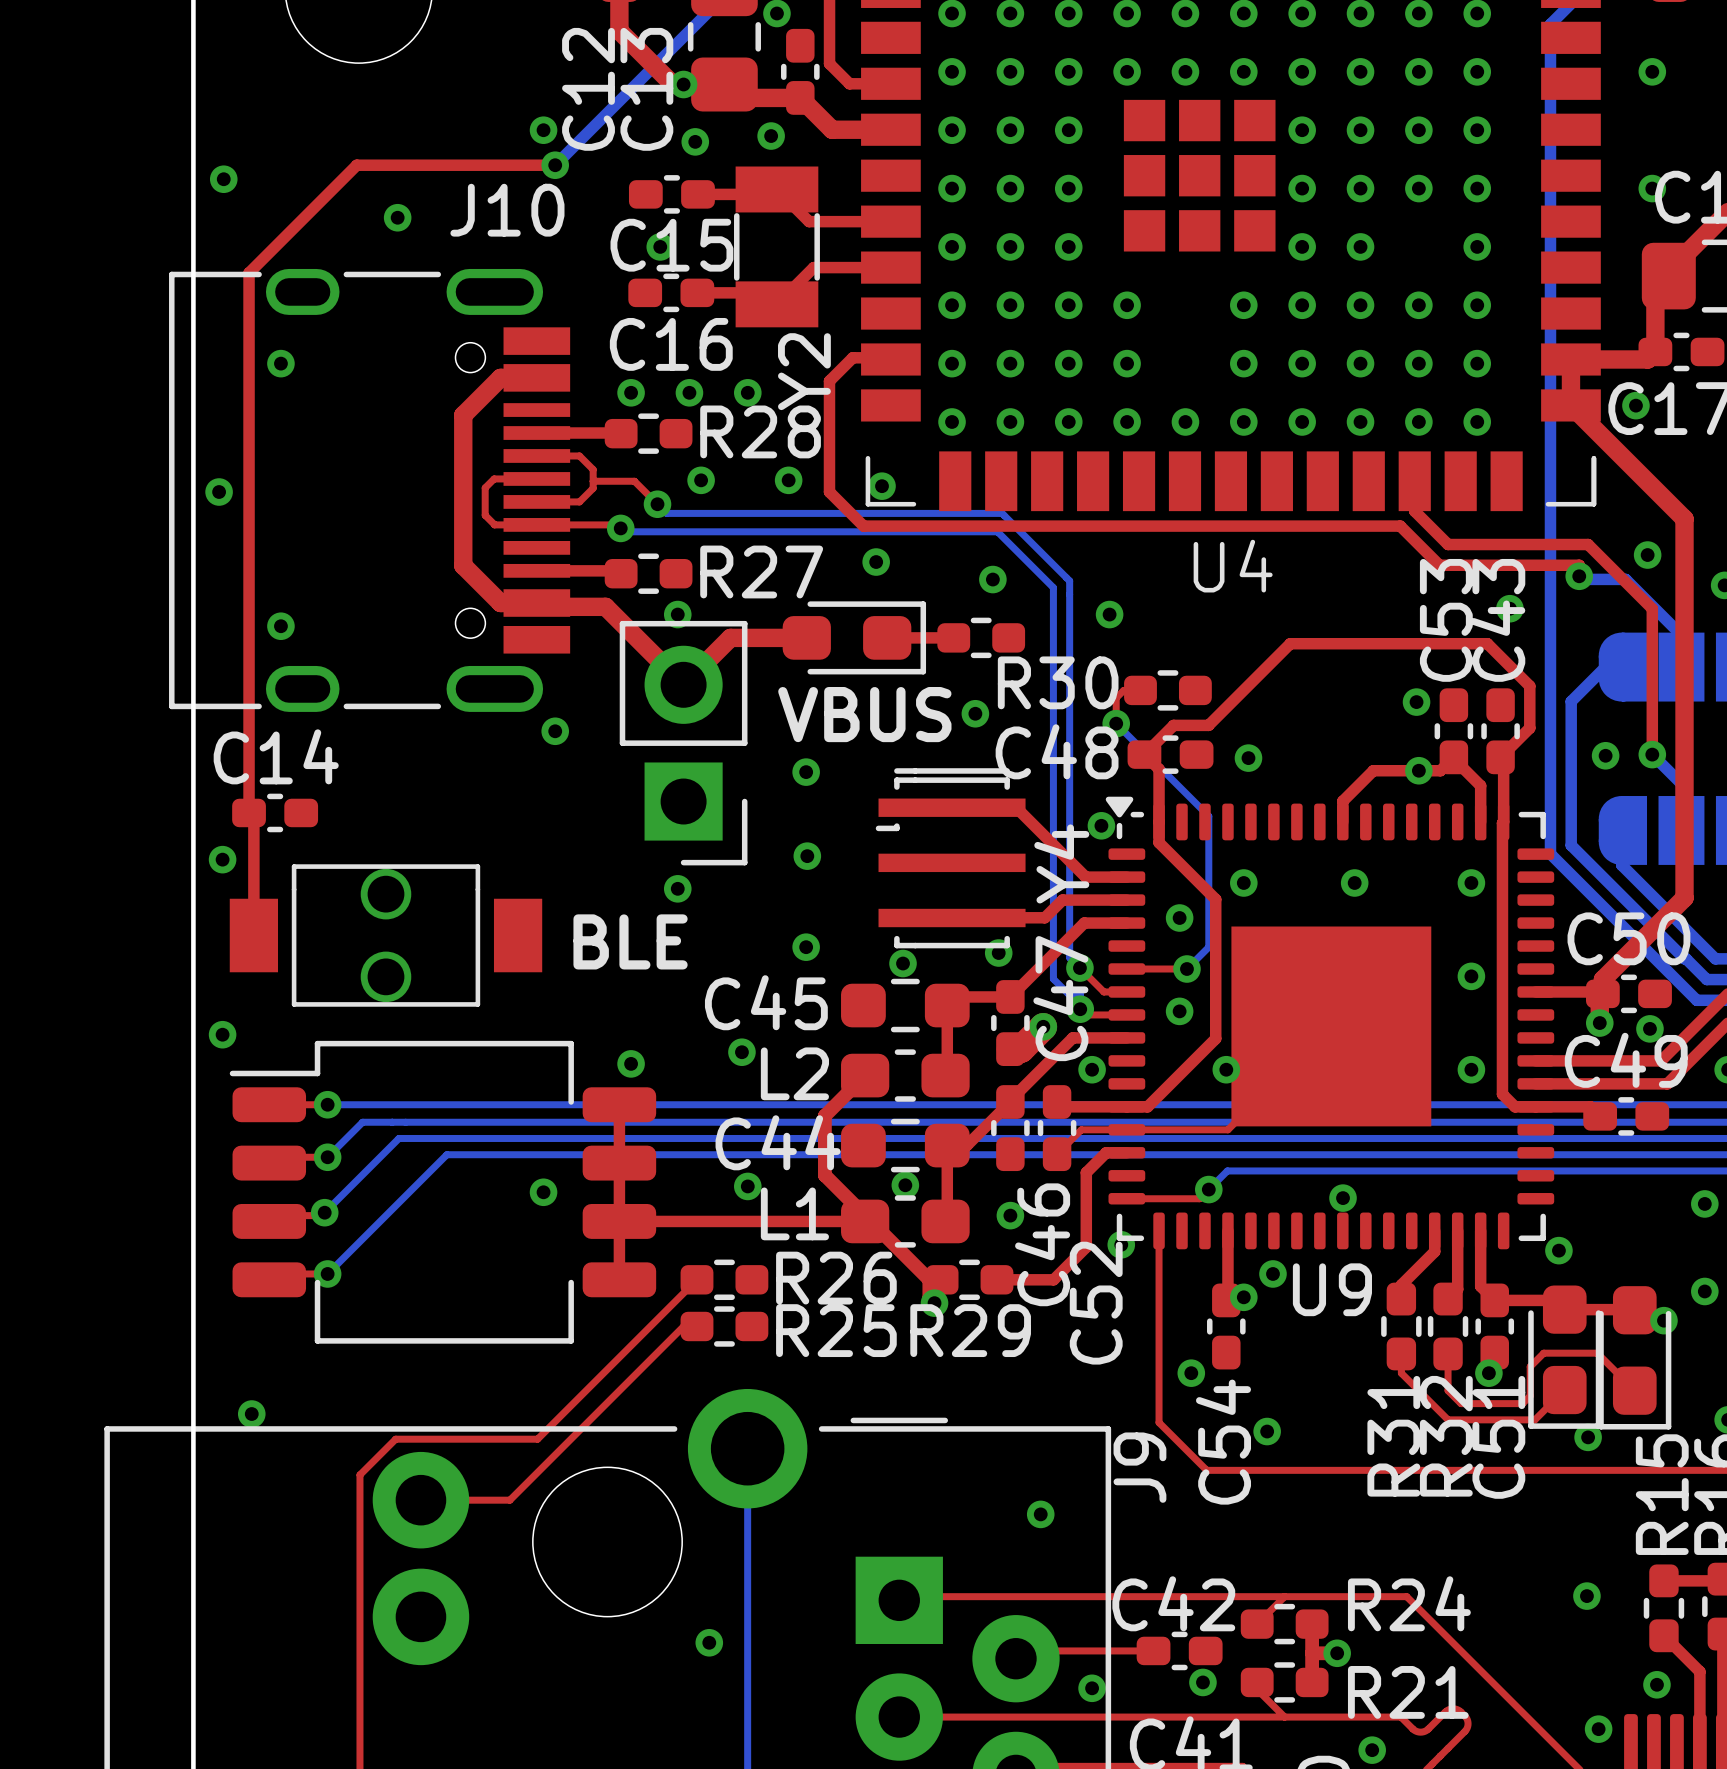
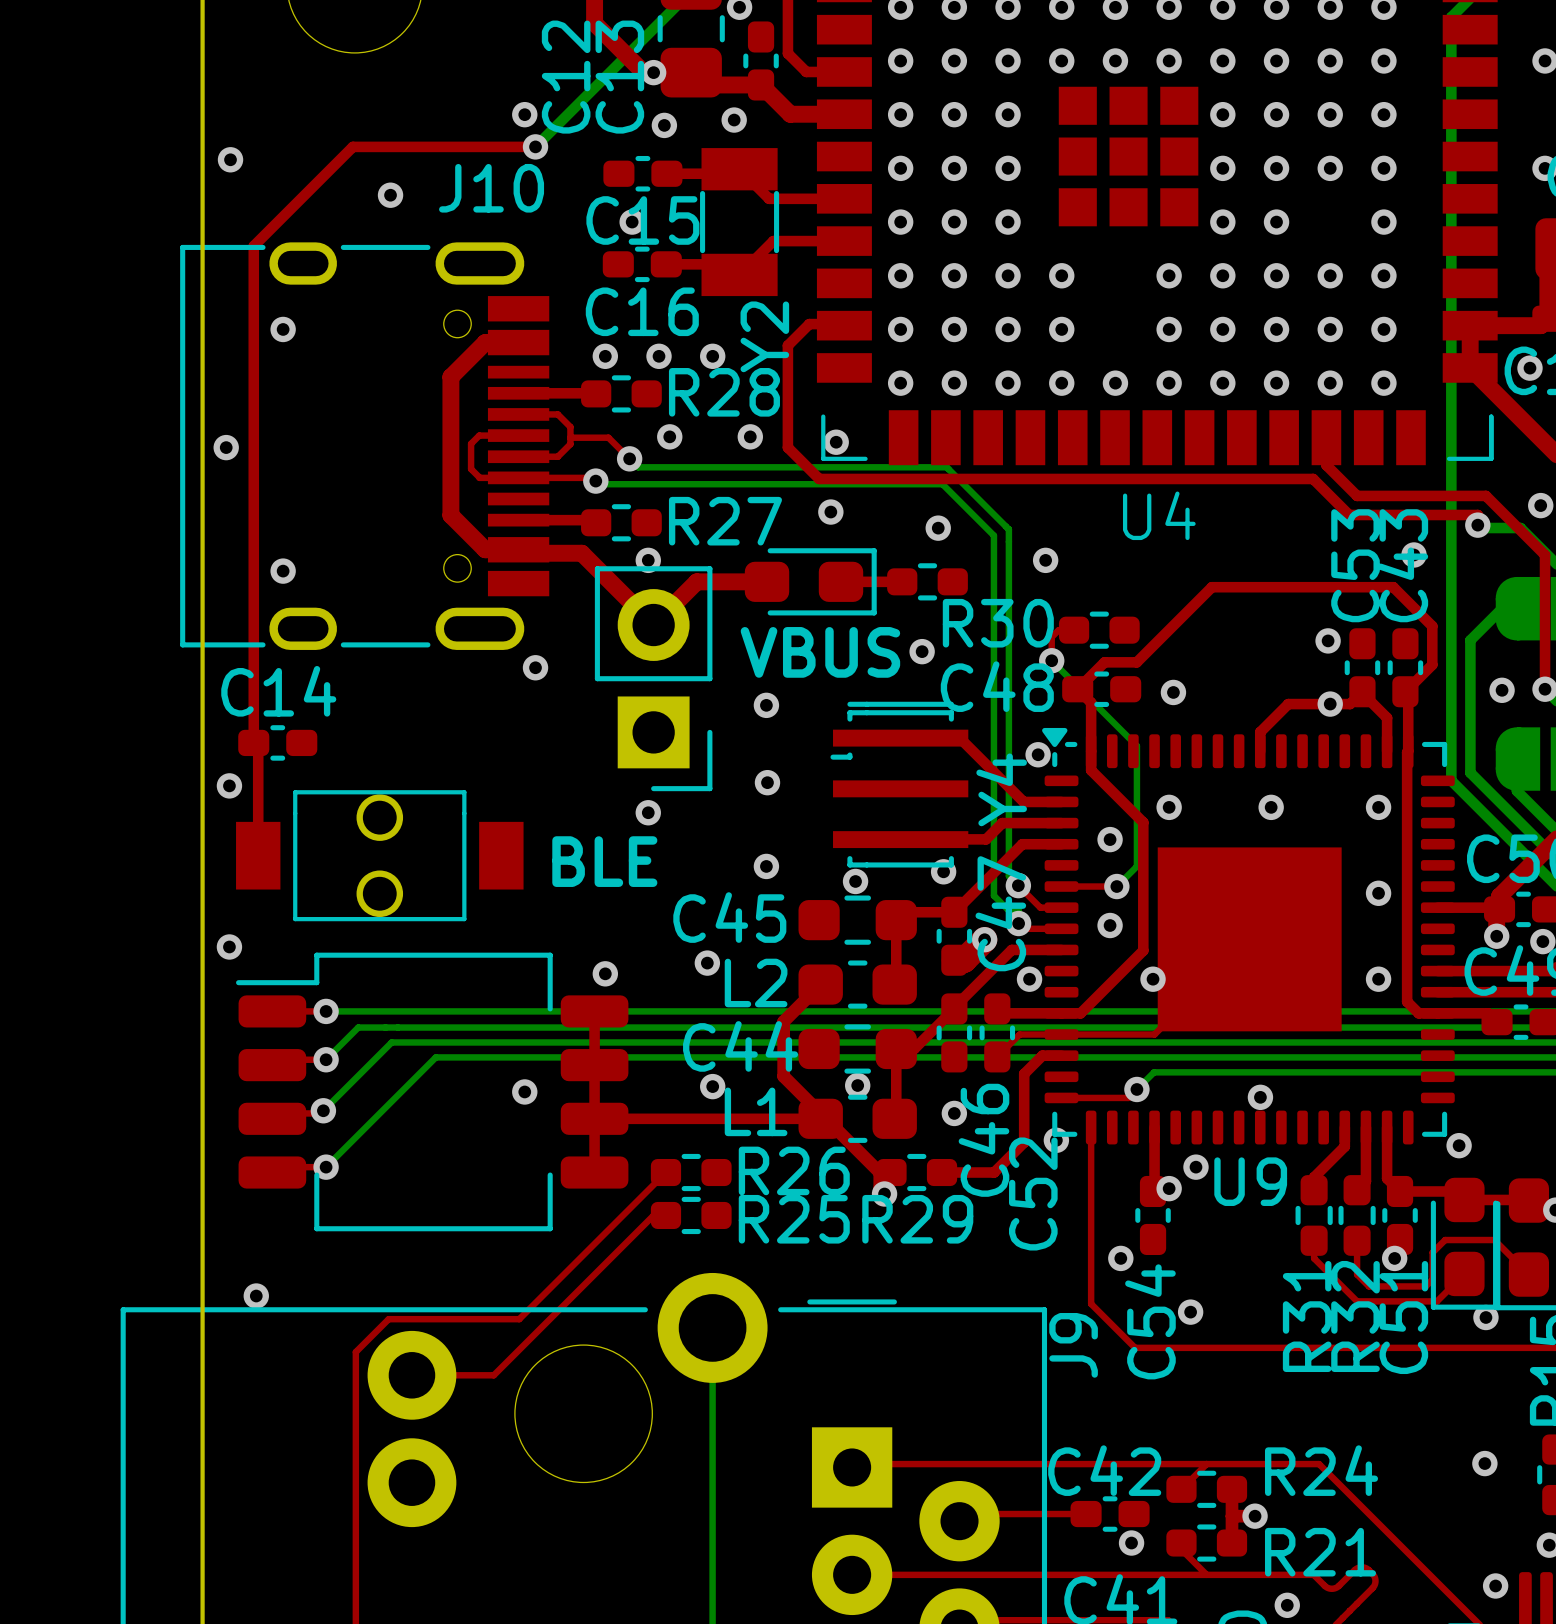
via: (1040, 1514) -> none
via: (709, 1642) -> none
via: (1092, 1688) -> none

